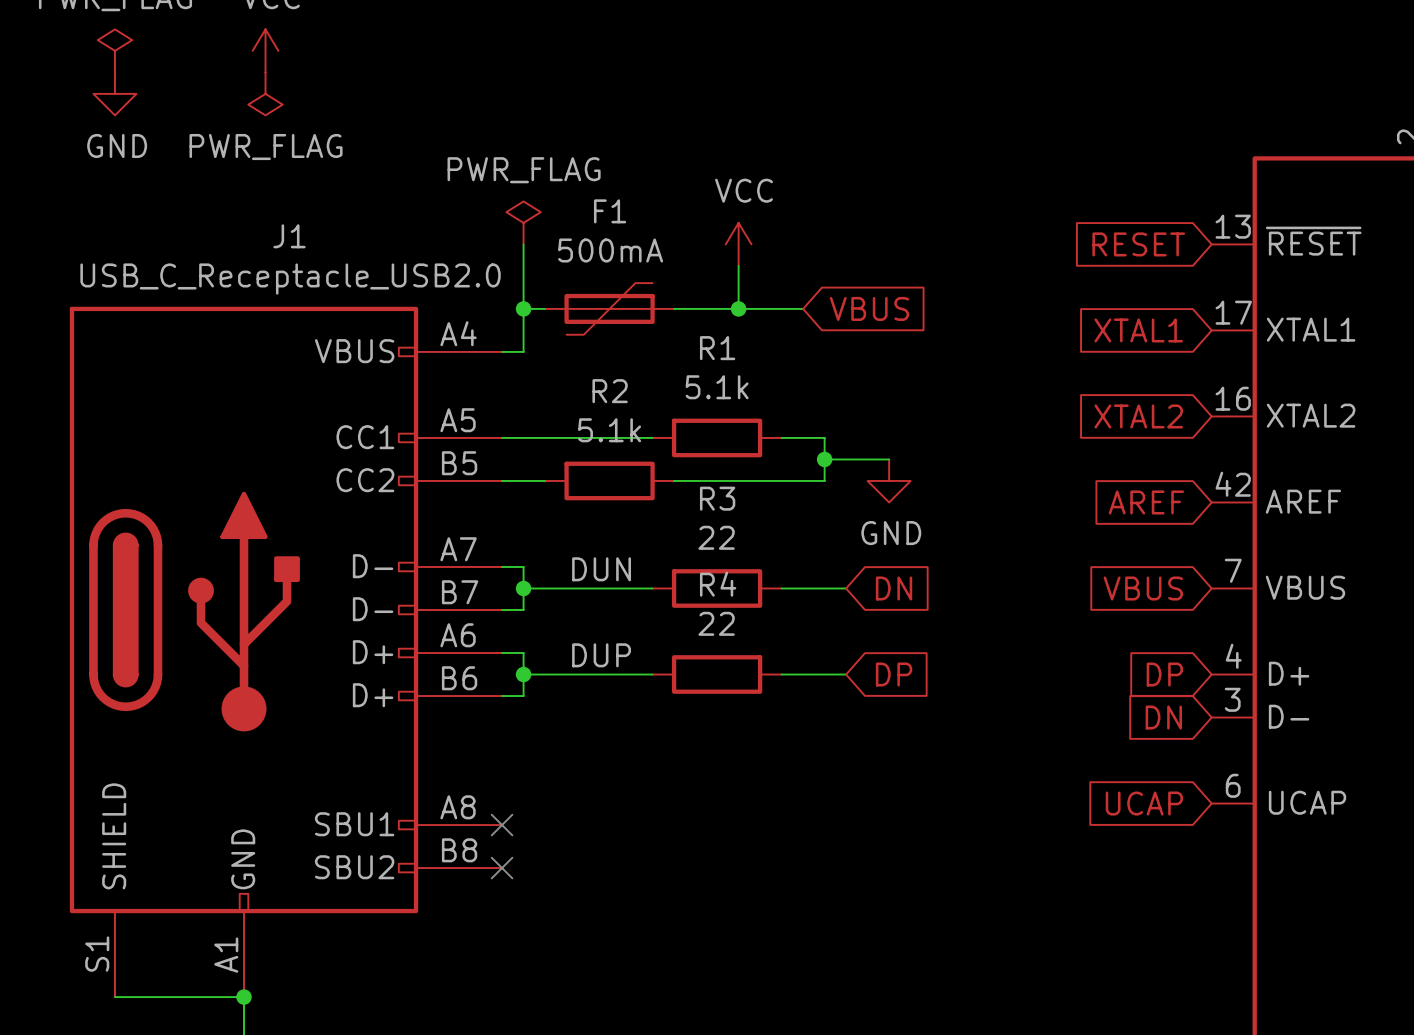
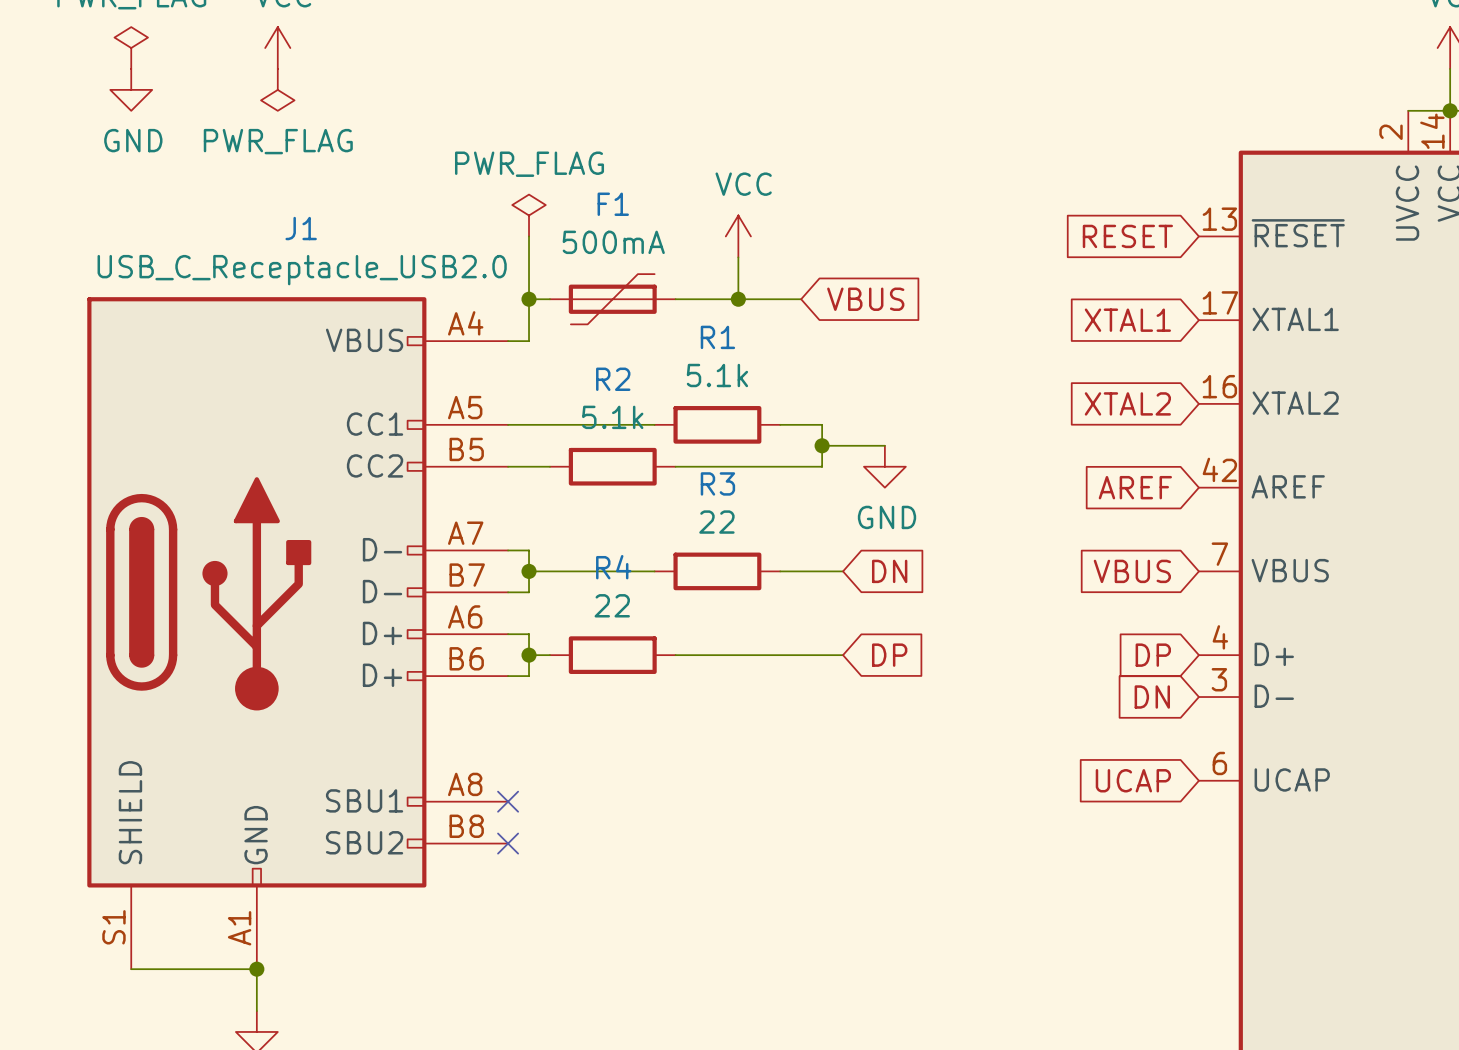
label: DUN (601, 569) -> none
label: DUP (601, 655) -> none
wire: (545, 674) (652, 674) -> (675, 655) (780, 655)
R4 position: (717, 674) -> (612, 655)

